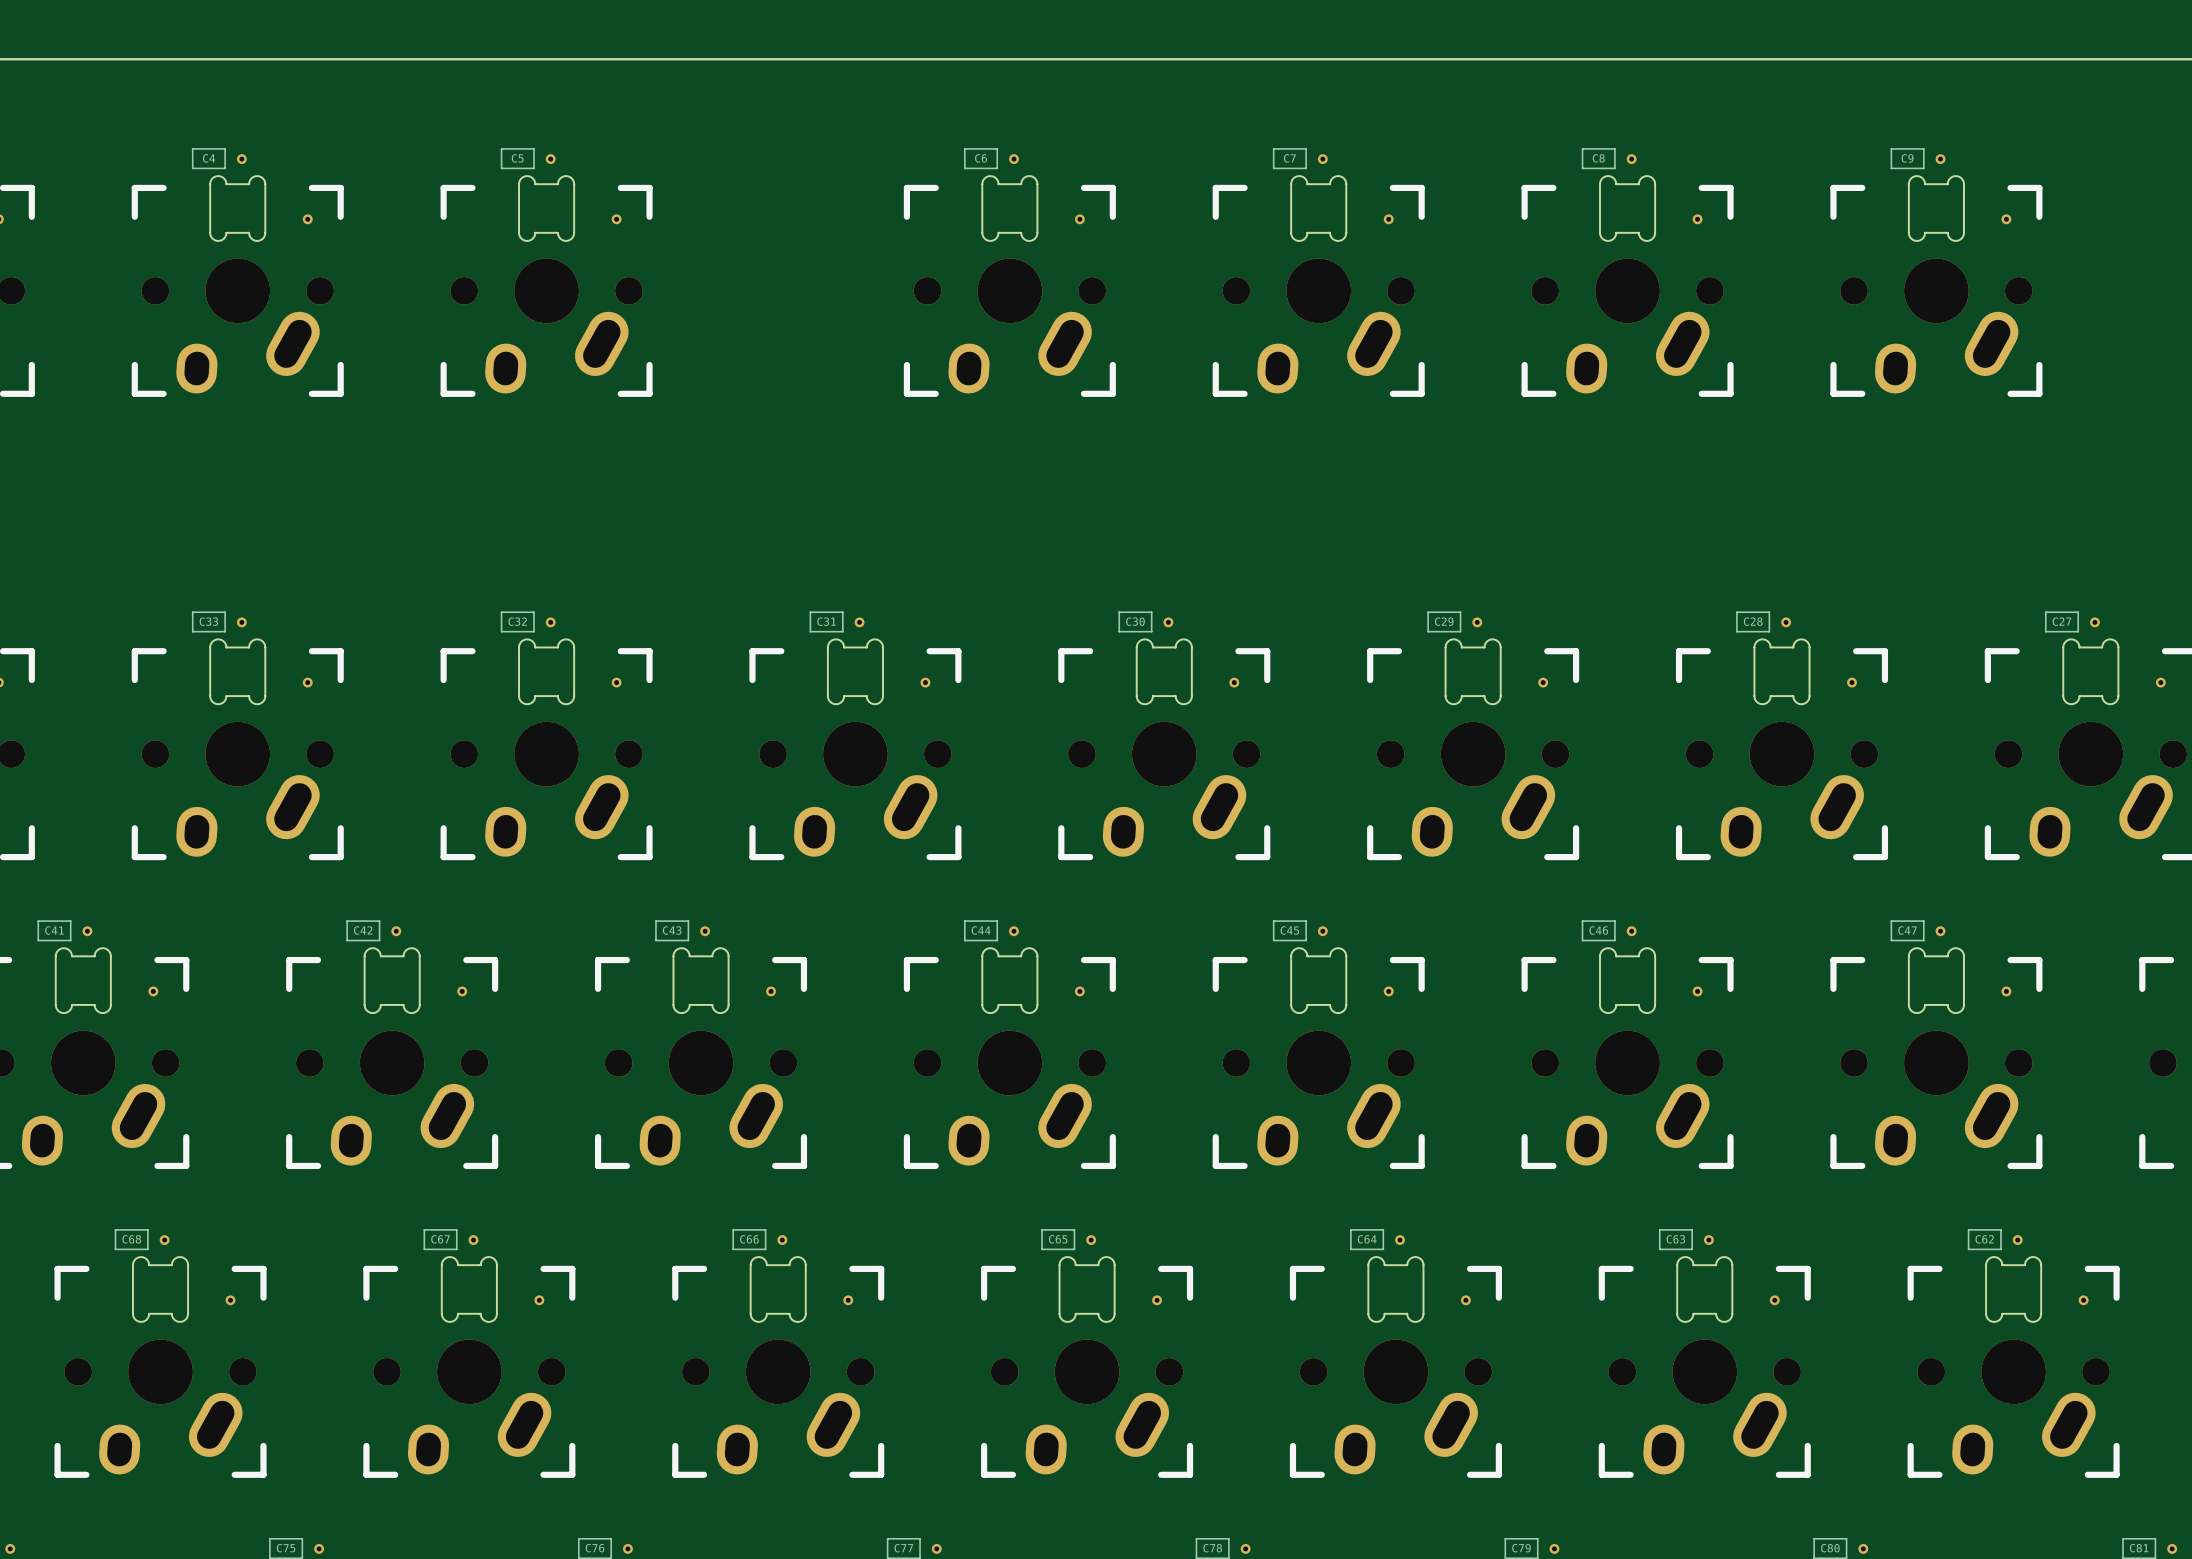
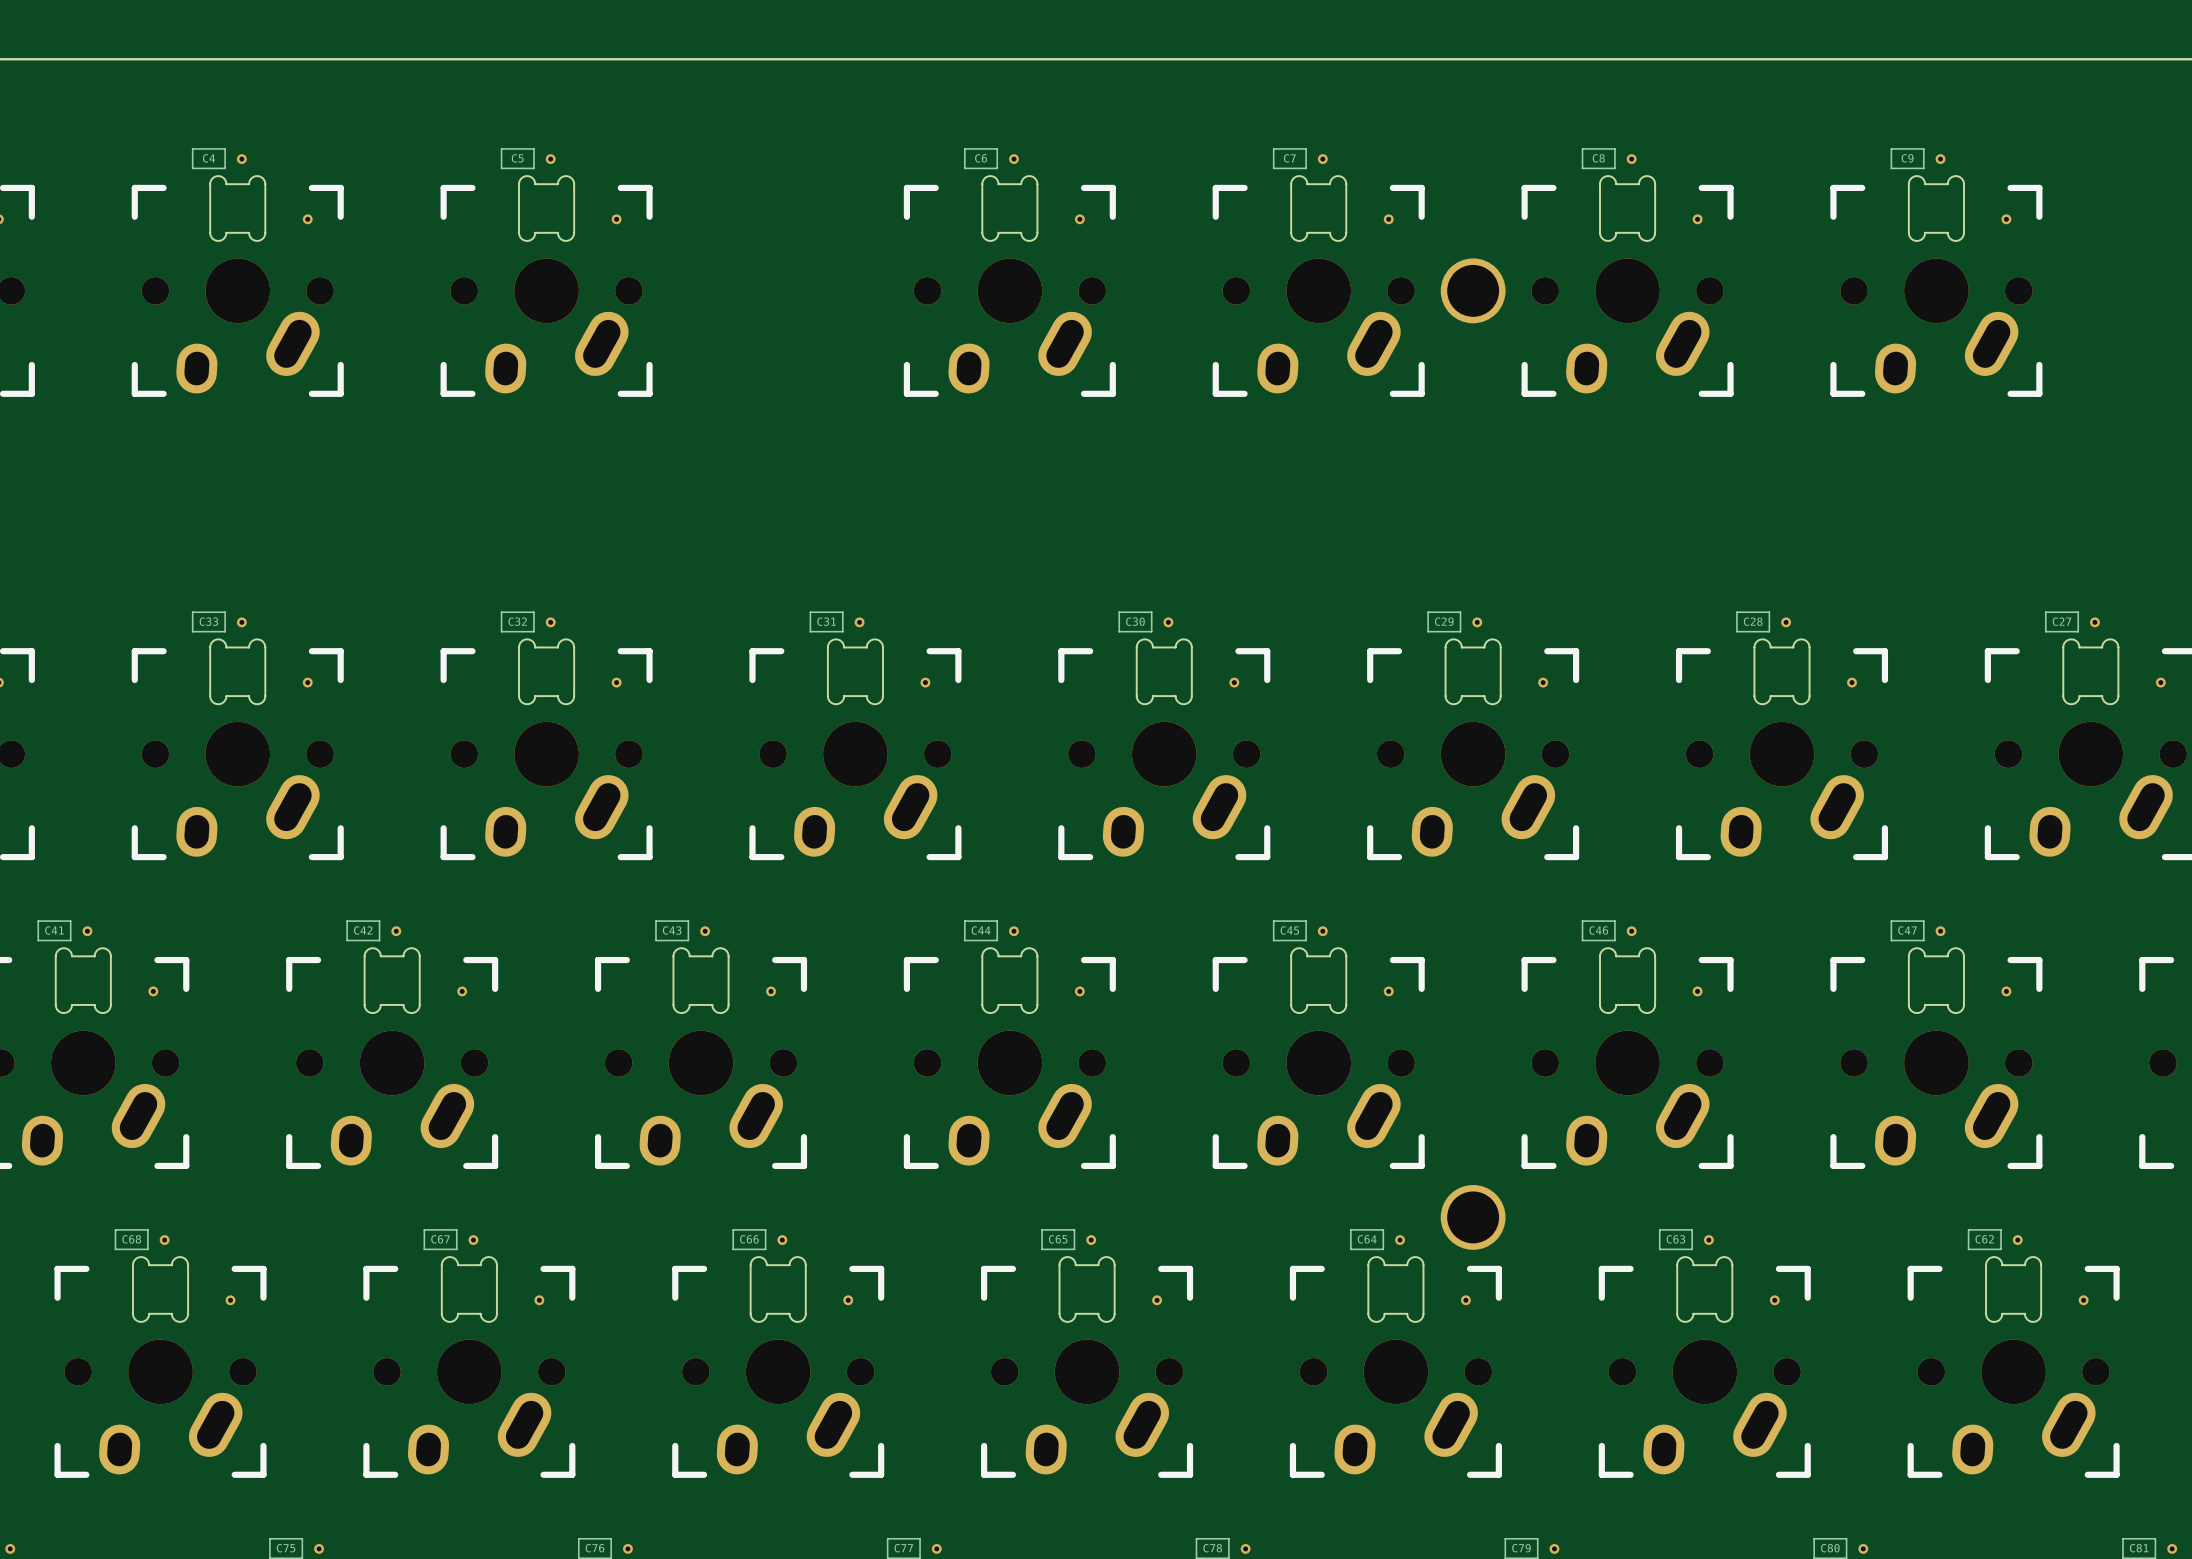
part: none -> (1473, 290)
part: none -> (1473, 1217)

